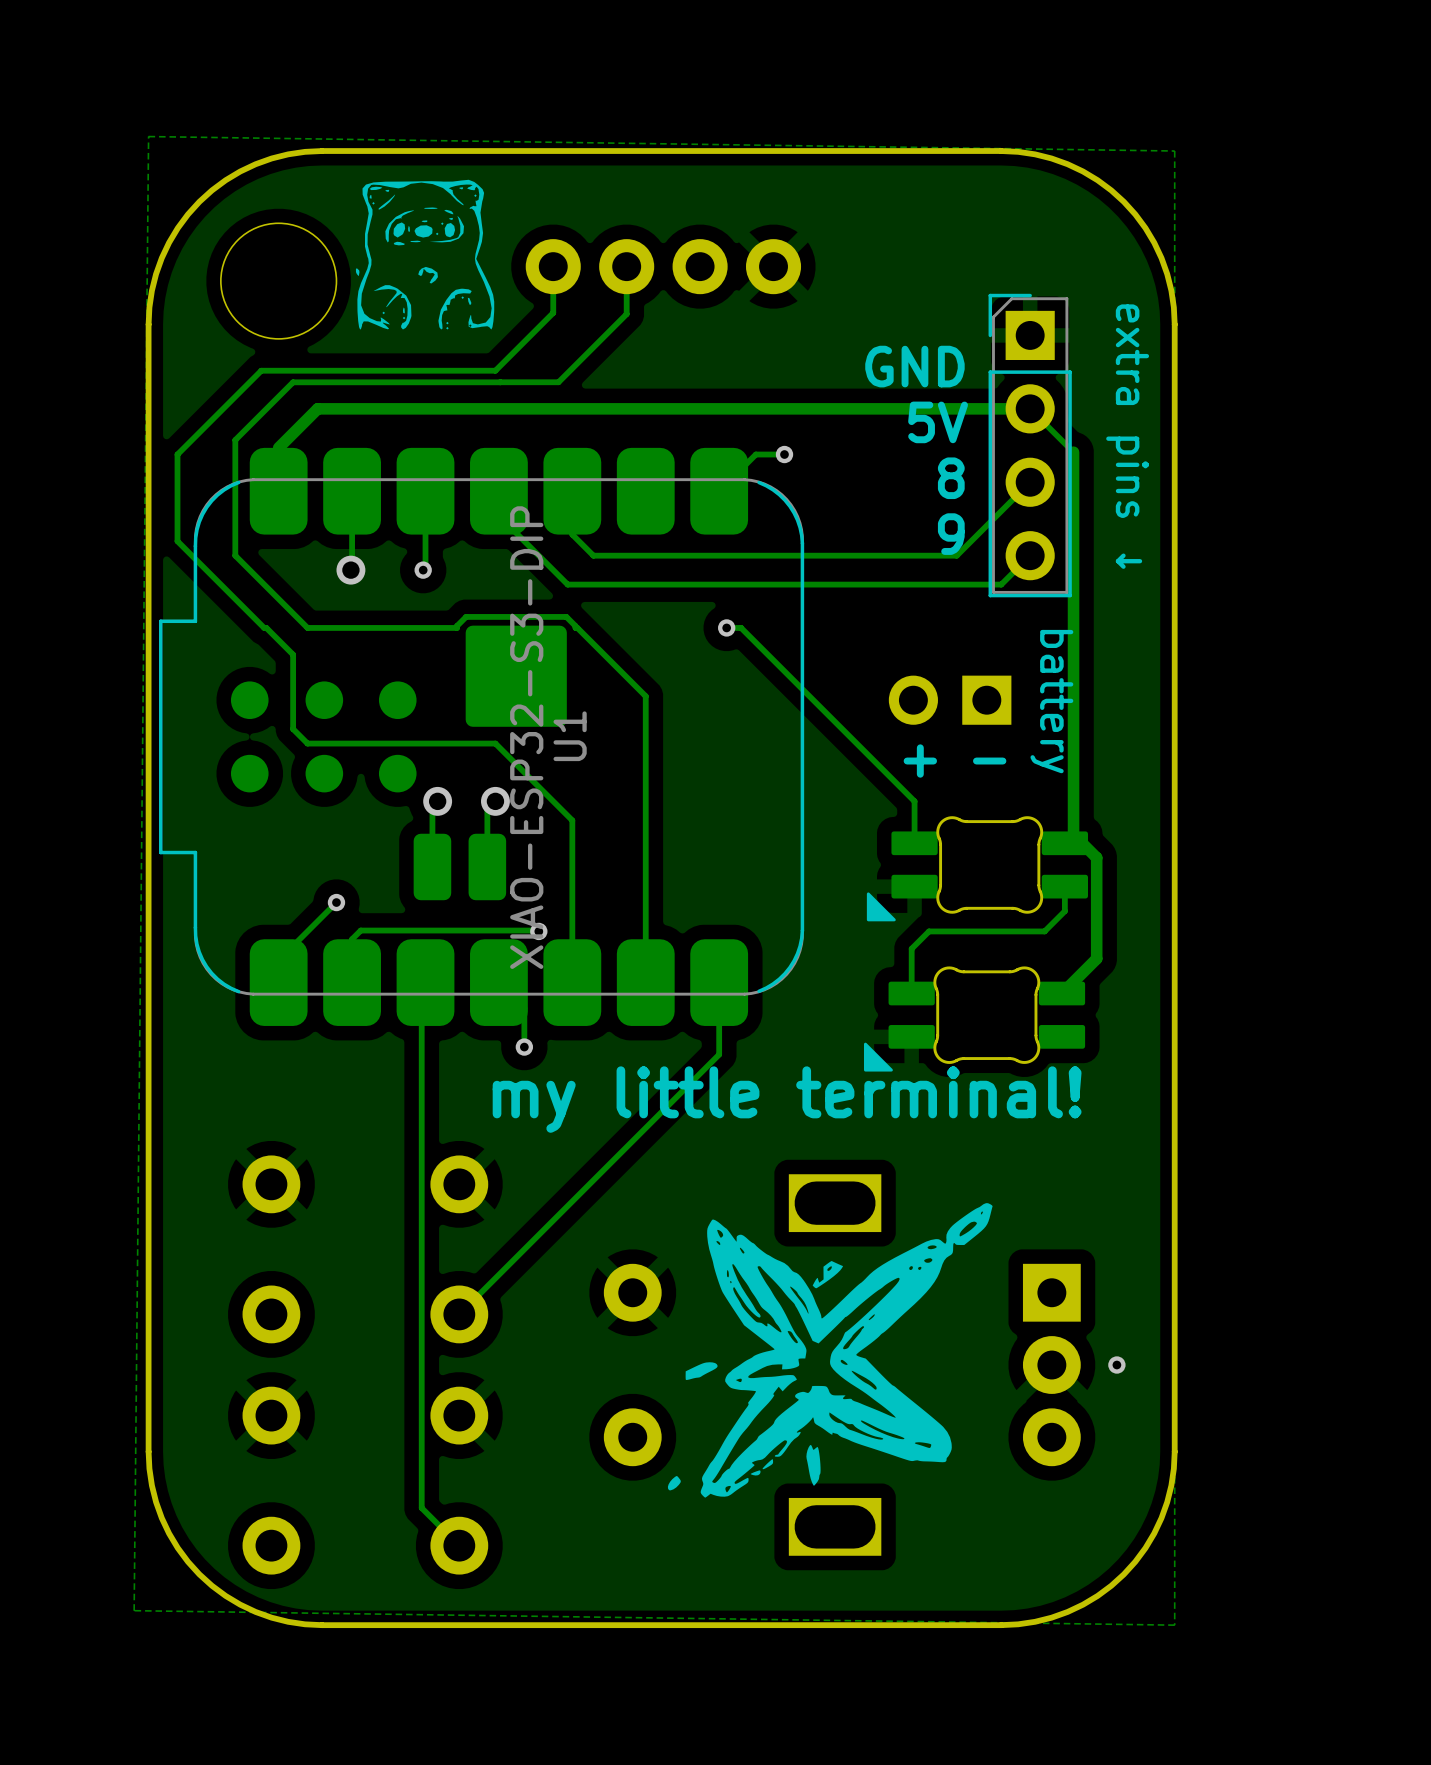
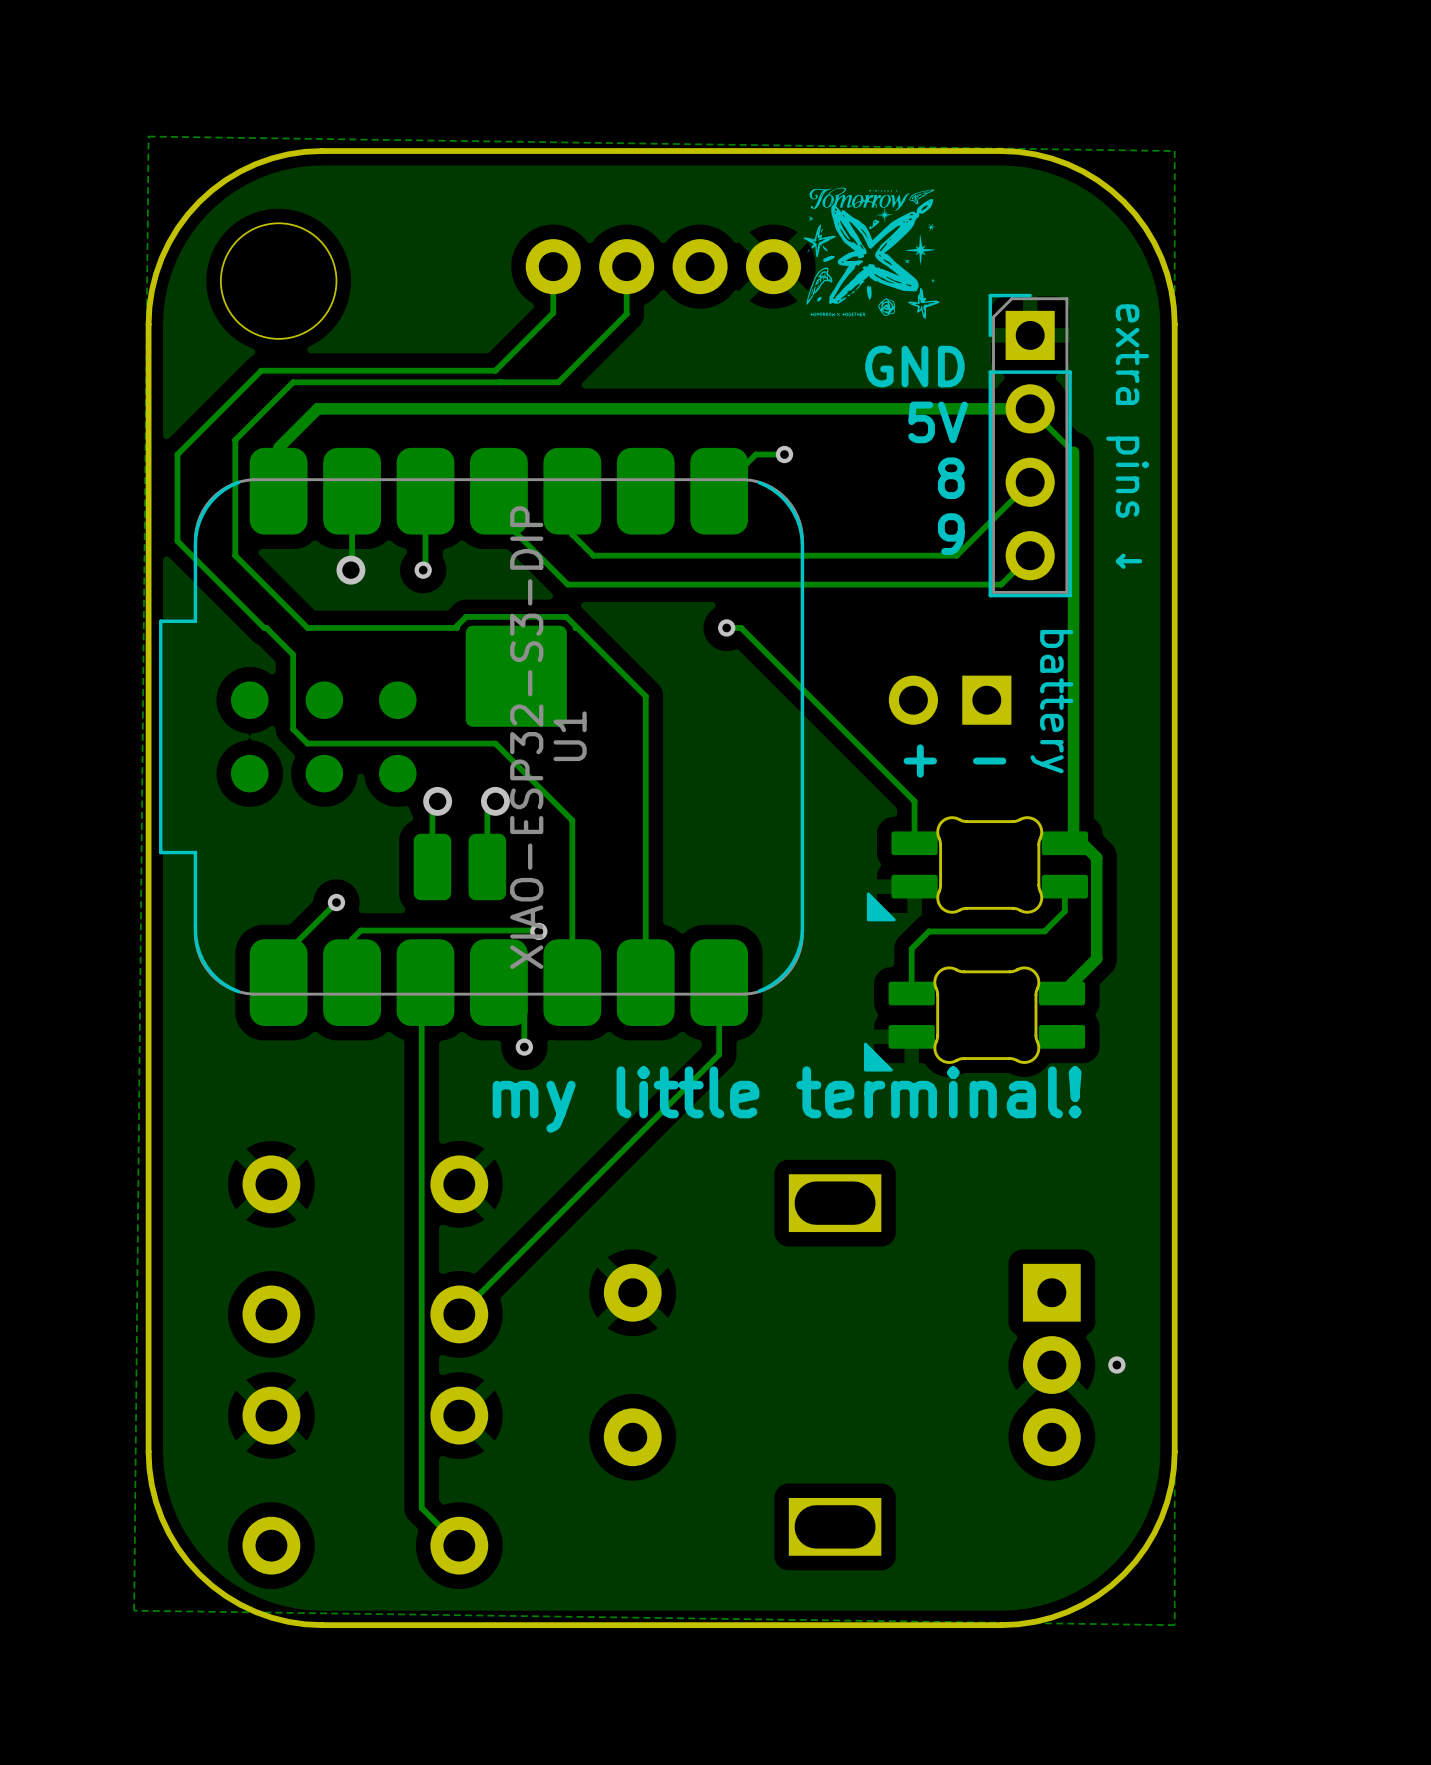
drawing: [355, 179, 495, 330] -> none
drawing: none -> [803, 187, 940, 319]
drawing: [667, 1203, 993, 1498] -> none

